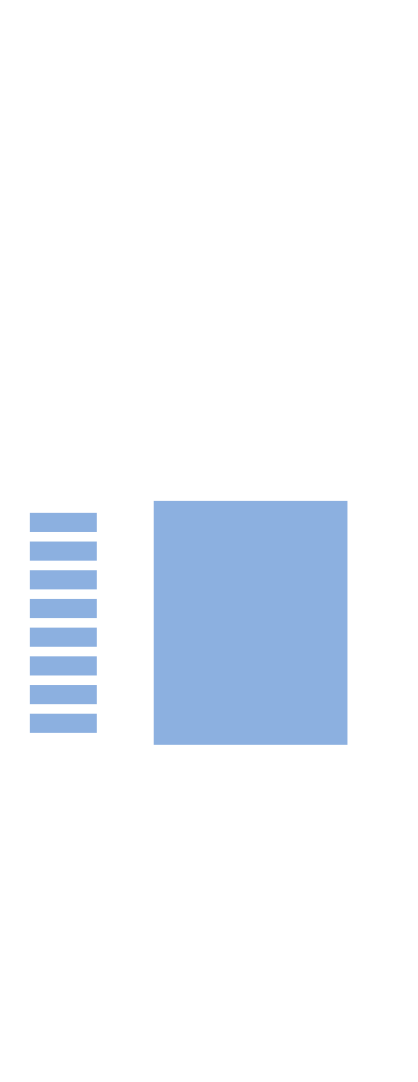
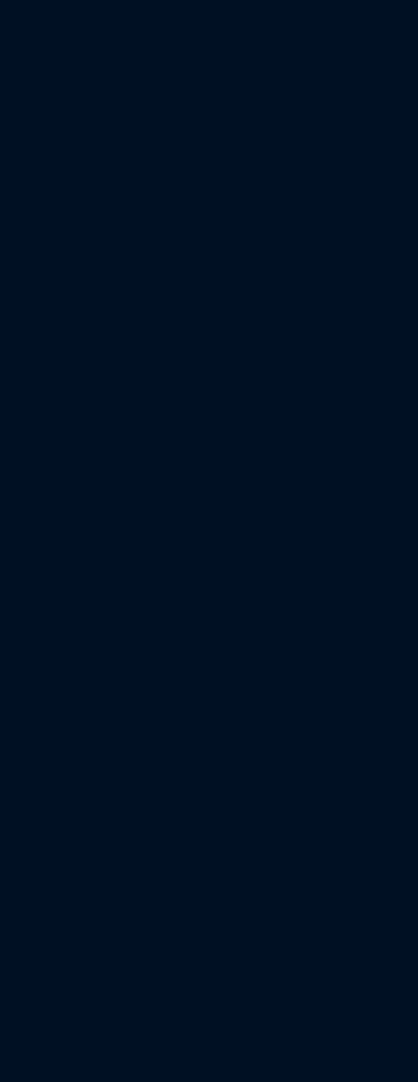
part: (188, 622) -> none

